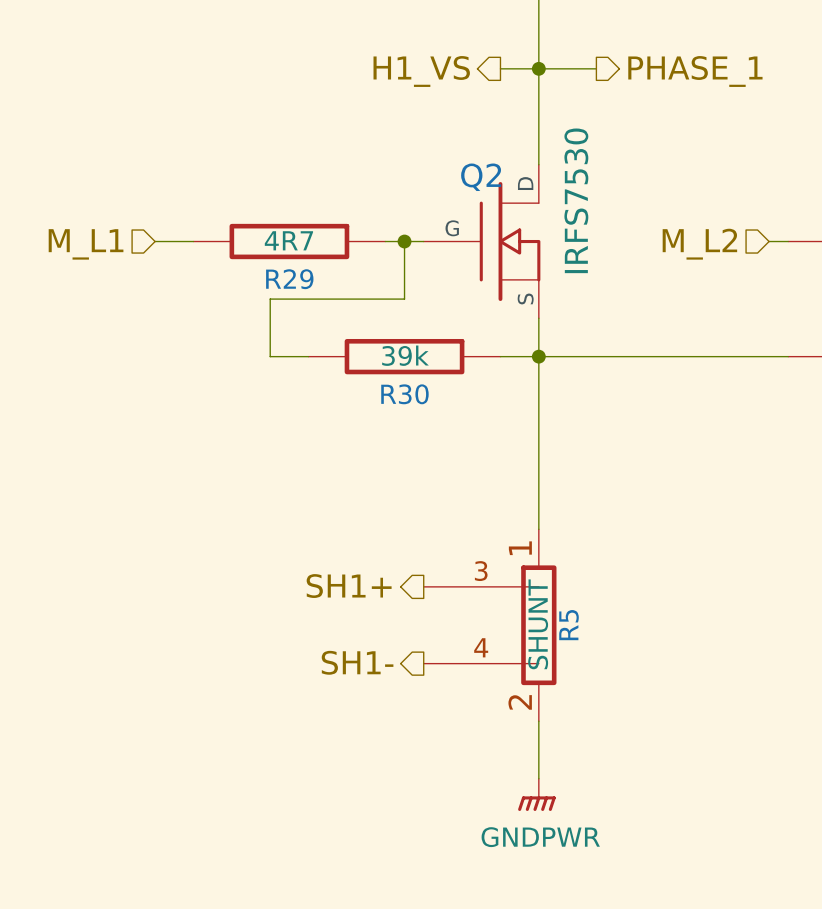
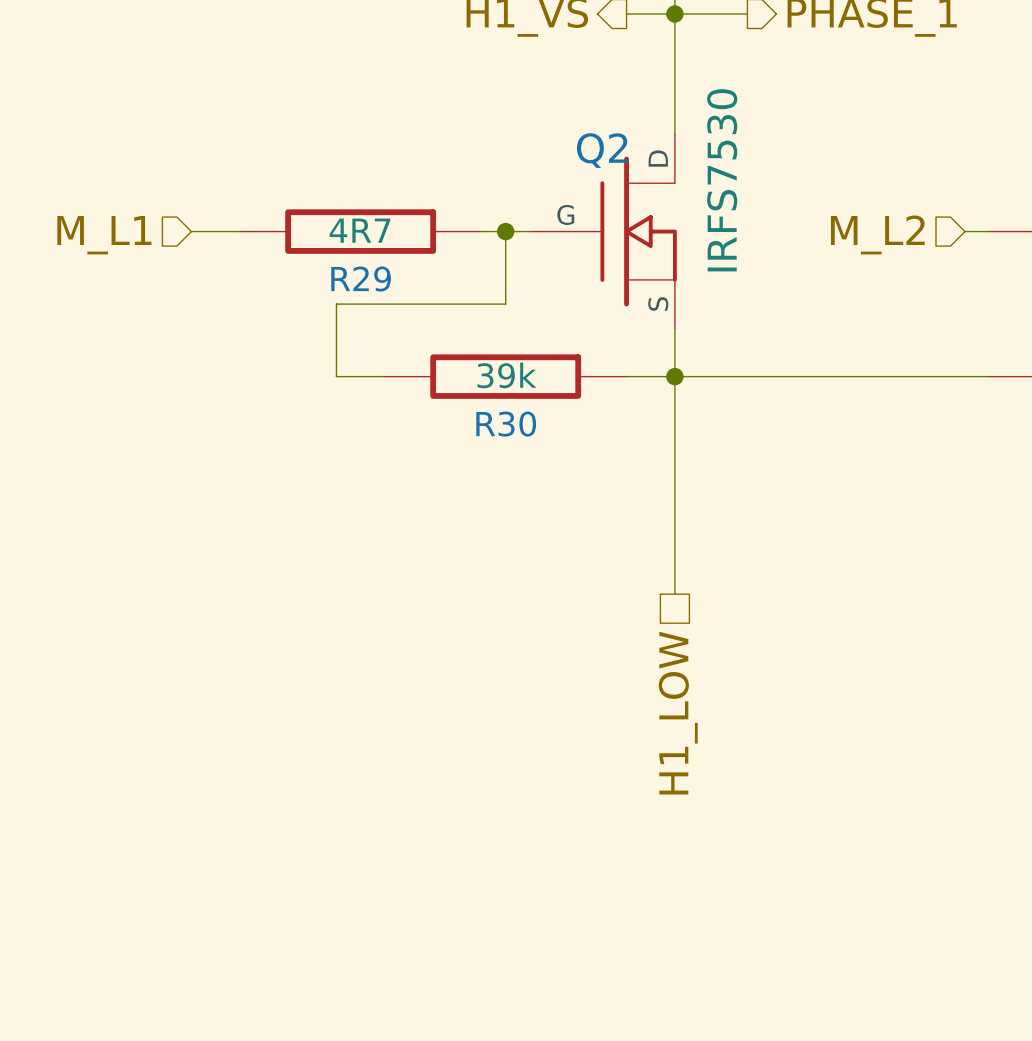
hierarchical label: SH1+ (349, 586) -> none
hierarchical label: none -> H1_LOW (678, 713)
R5: SHUNT (490, 625) -> none
hierarchical label: SH1- (357, 662) -> none
wire: (538, 721) (538, 778) -> none
power symbol: GNDPWR (536, 794) -> none

